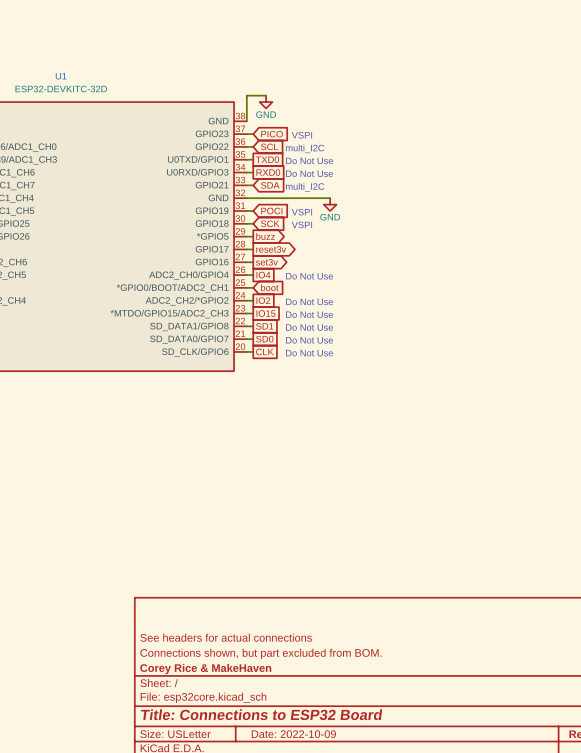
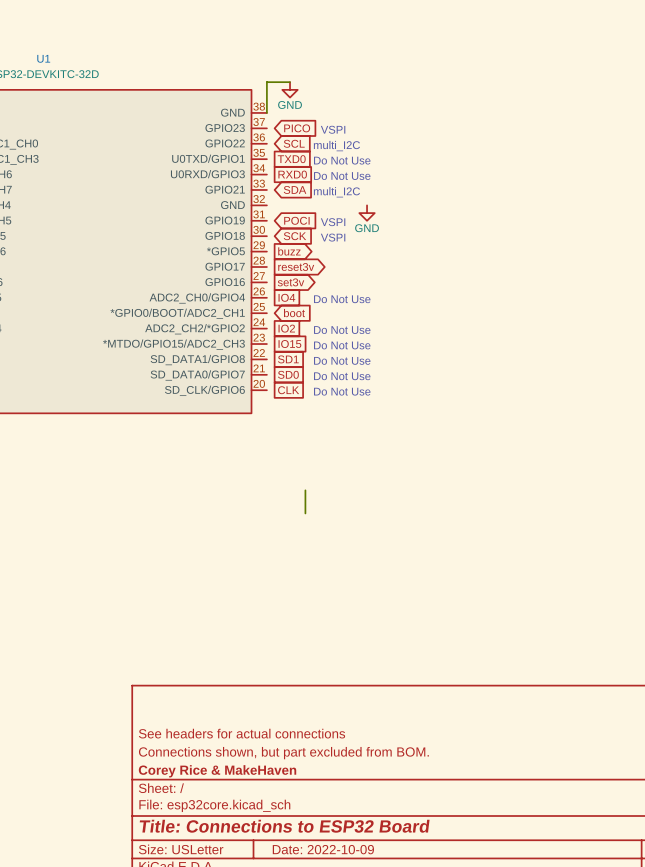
wire: (246, 134) (253, 134) -> none
wire: (246, 146) (253, 146) -> none
wire: (246, 159) (253, 159) -> none
wire: (246, 172) (253, 172) -> none
wire: (246, 185) (253, 185) -> none
wire: (246, 198) (330, 198) -> none
wire: (246, 211) (253, 211) -> none
wire: (246, 223) (253, 223) -> none
wire: (246, 236) (253, 236) -> none
wire: (246, 249) (253, 249) -> none
wire: (246, 262) (253, 262) -> none
wire: (246, 275) (253, 275) -> none
wire: (246, 287) (253, 287) -> none
wire: (246, 300) (253, 300) -> none
wire: (246, 313) (253, 313) -> none
wire: (246, 326) (253, 326) -> none
wire: (246, 339) (253, 339) -> none
wire: (246, 351) (253, 351) -> none
wire: none -> (305, 490) (305, 513)

